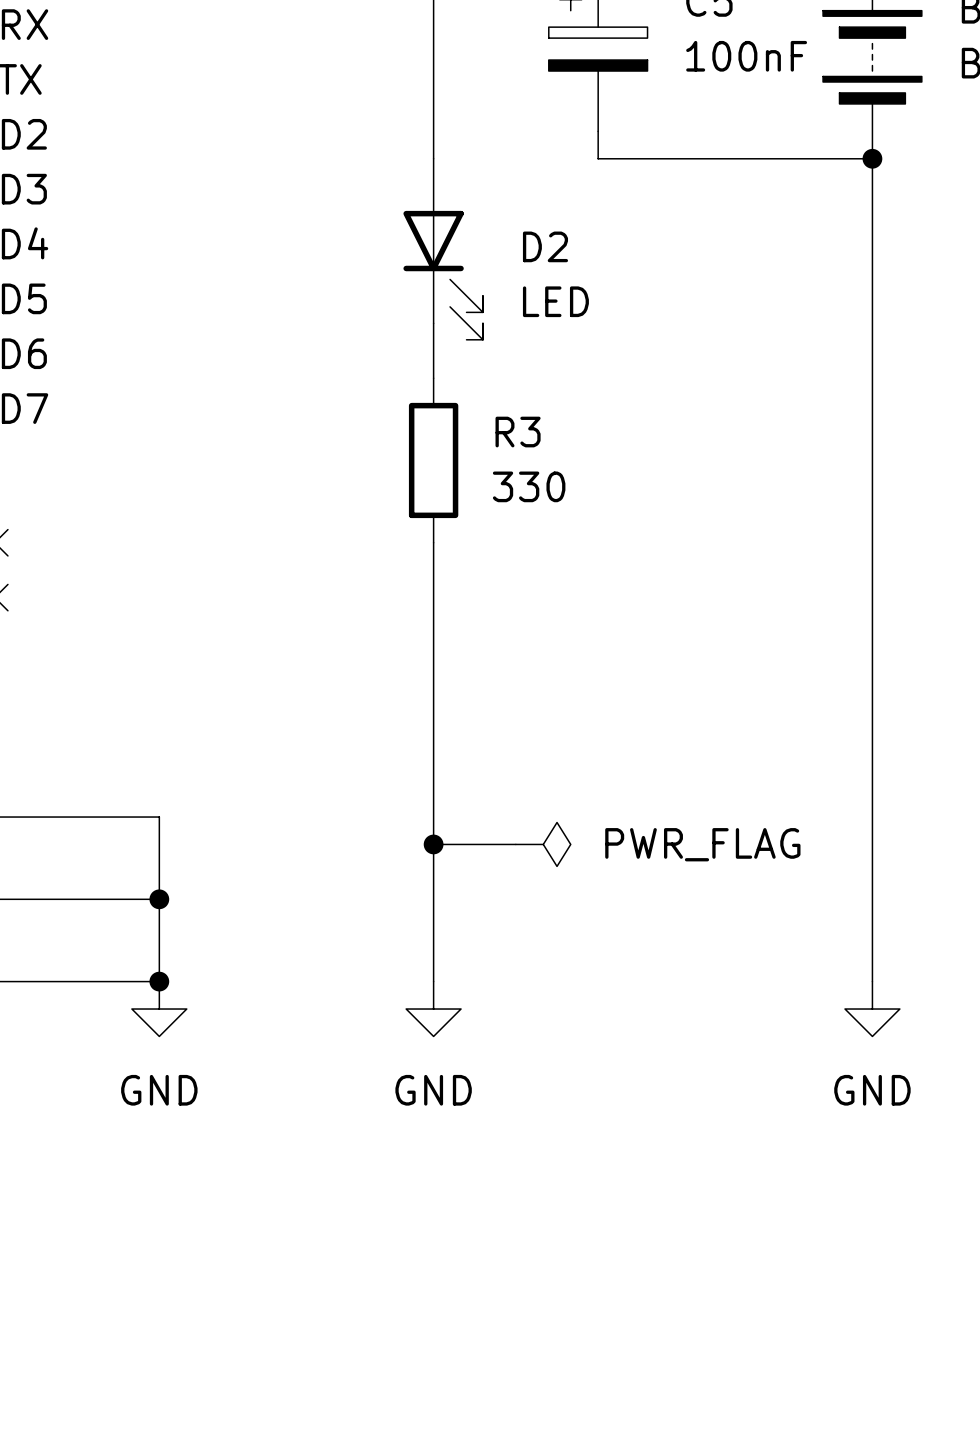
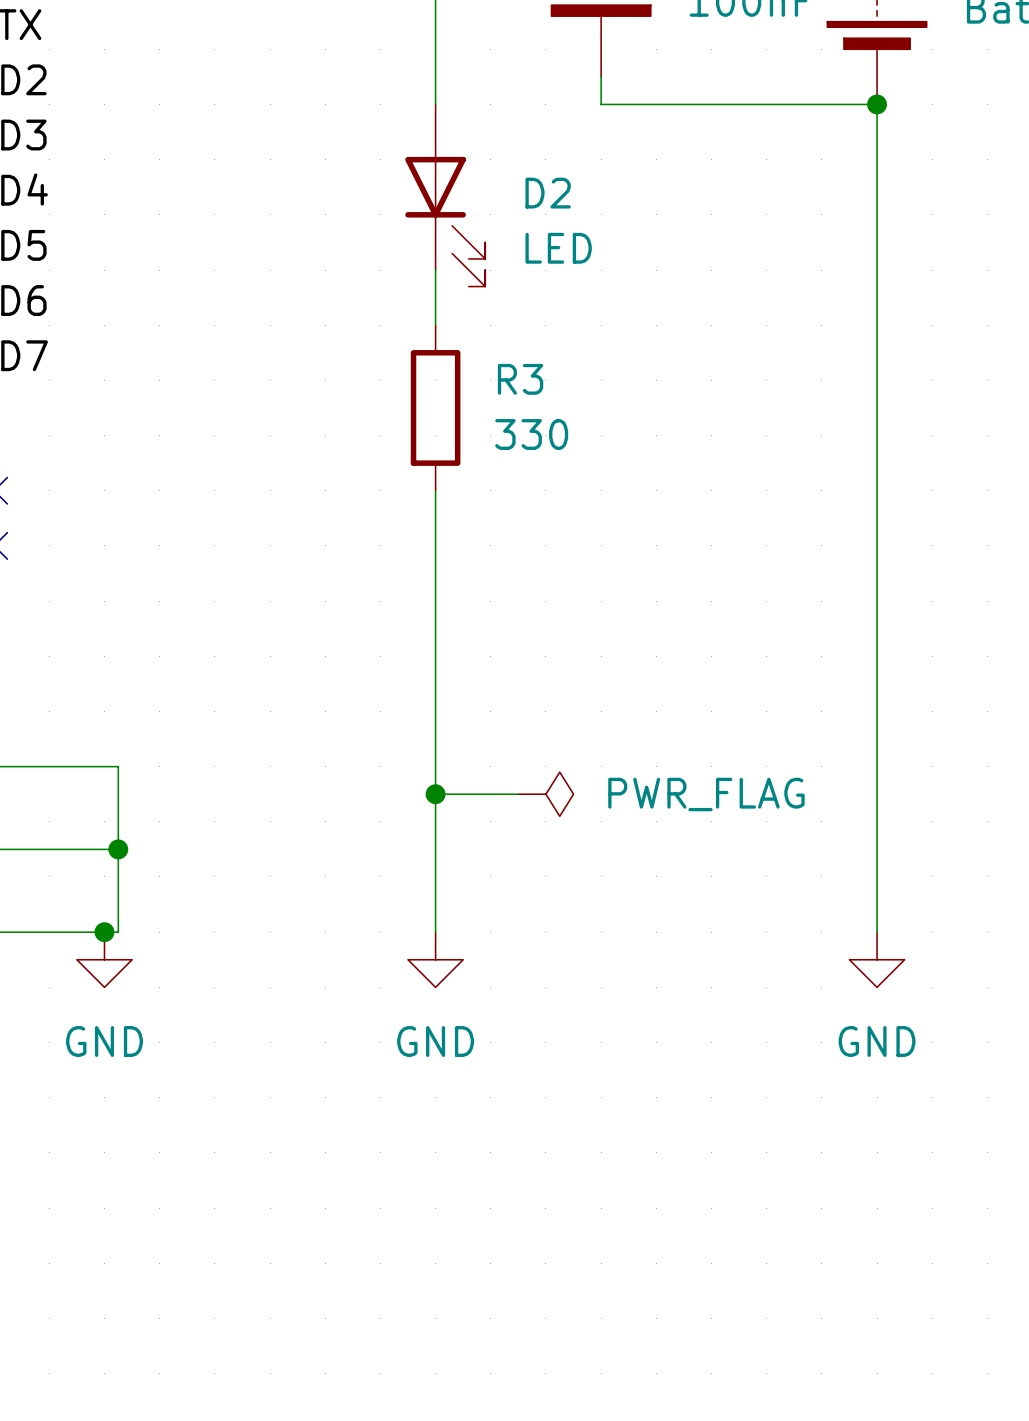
wire: (118, 817) (159, 817) (159, 981) (118, 981) -> (118, 766) (118, 932)
wire: (118, 899) (159, 899) -> none
junction position: (159, 899) -> (118, 849)
junction: none -> (104, 932)
junction: (159, 981) -> none
power symbol position: GND (159, 1009) -> GND (104, 959)

